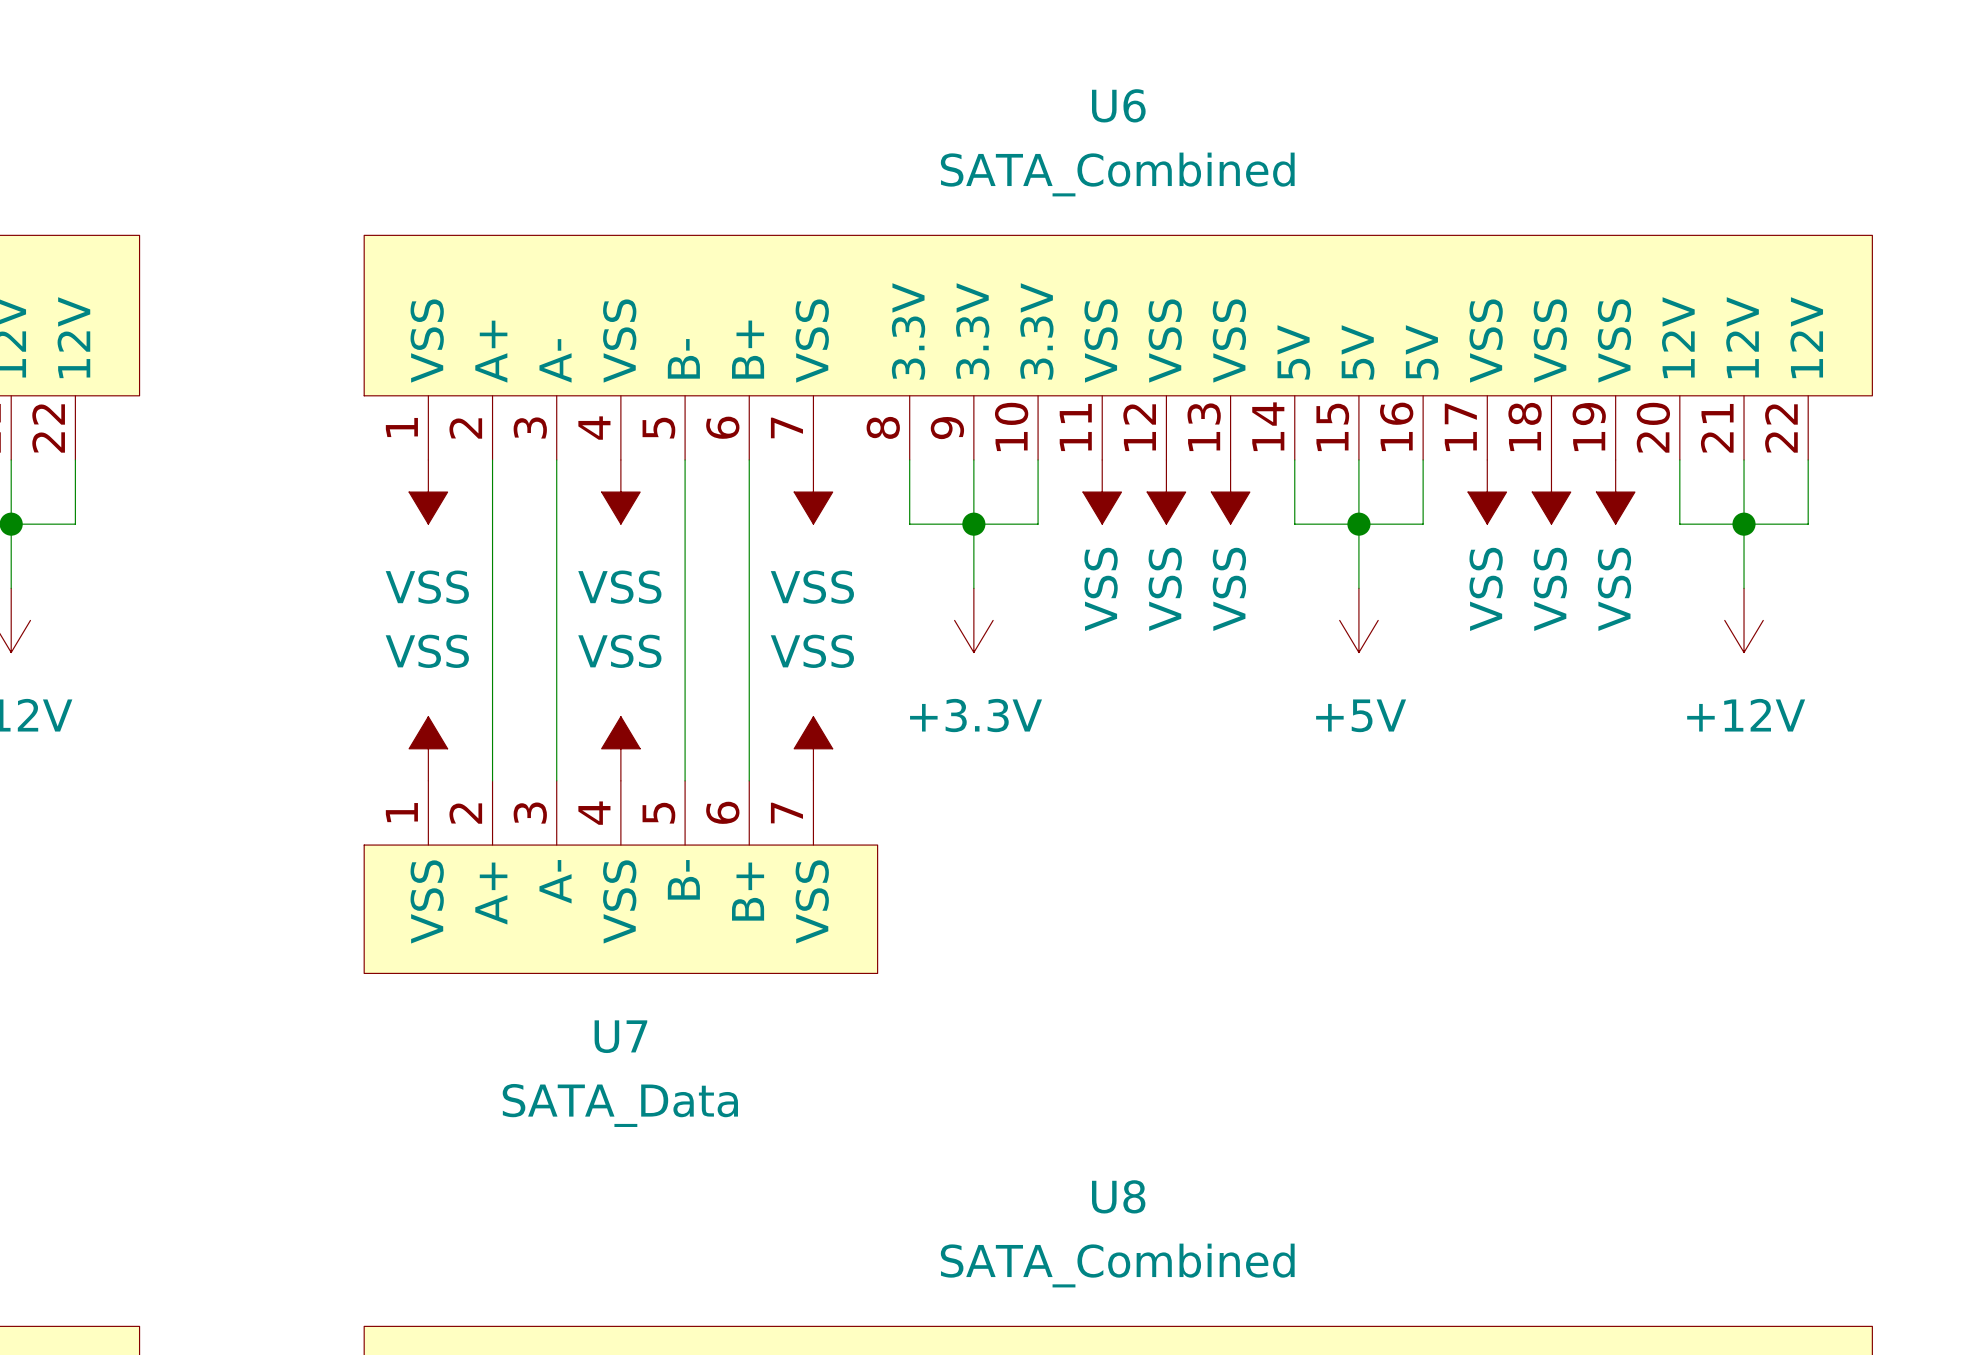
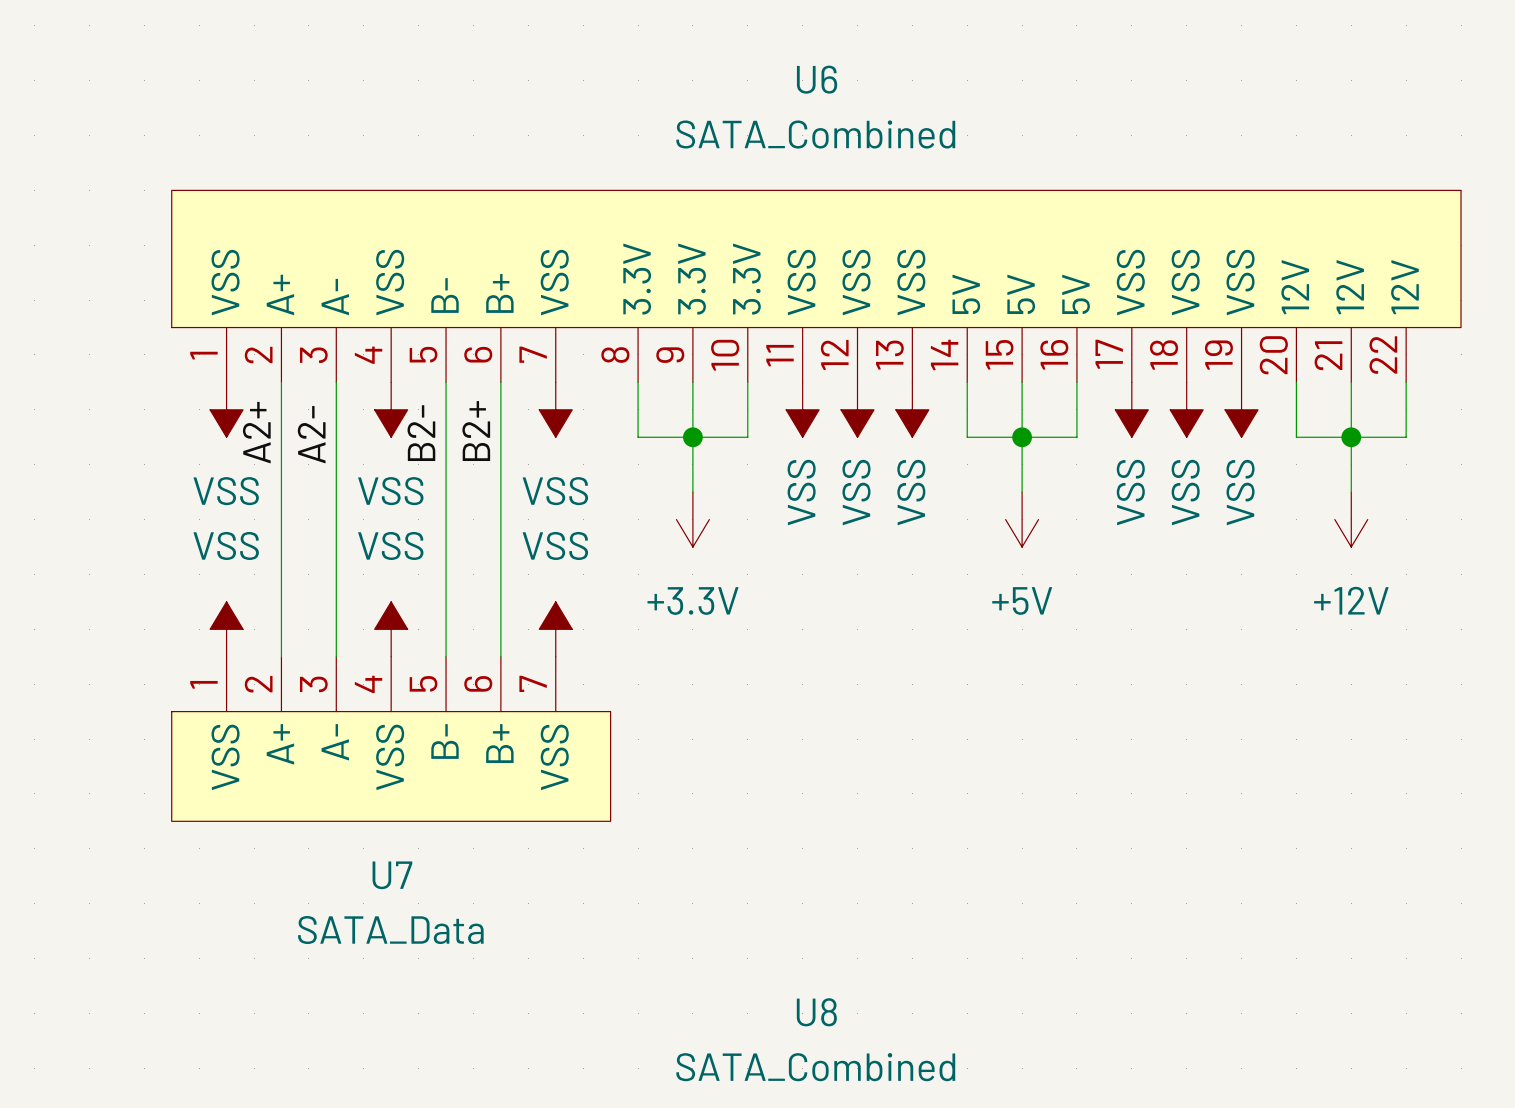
label: none -> B2+ (476, 431)
label: none -> A2+ (256, 432)
label: none -> B2- (421, 433)
label: none -> A2- (311, 434)

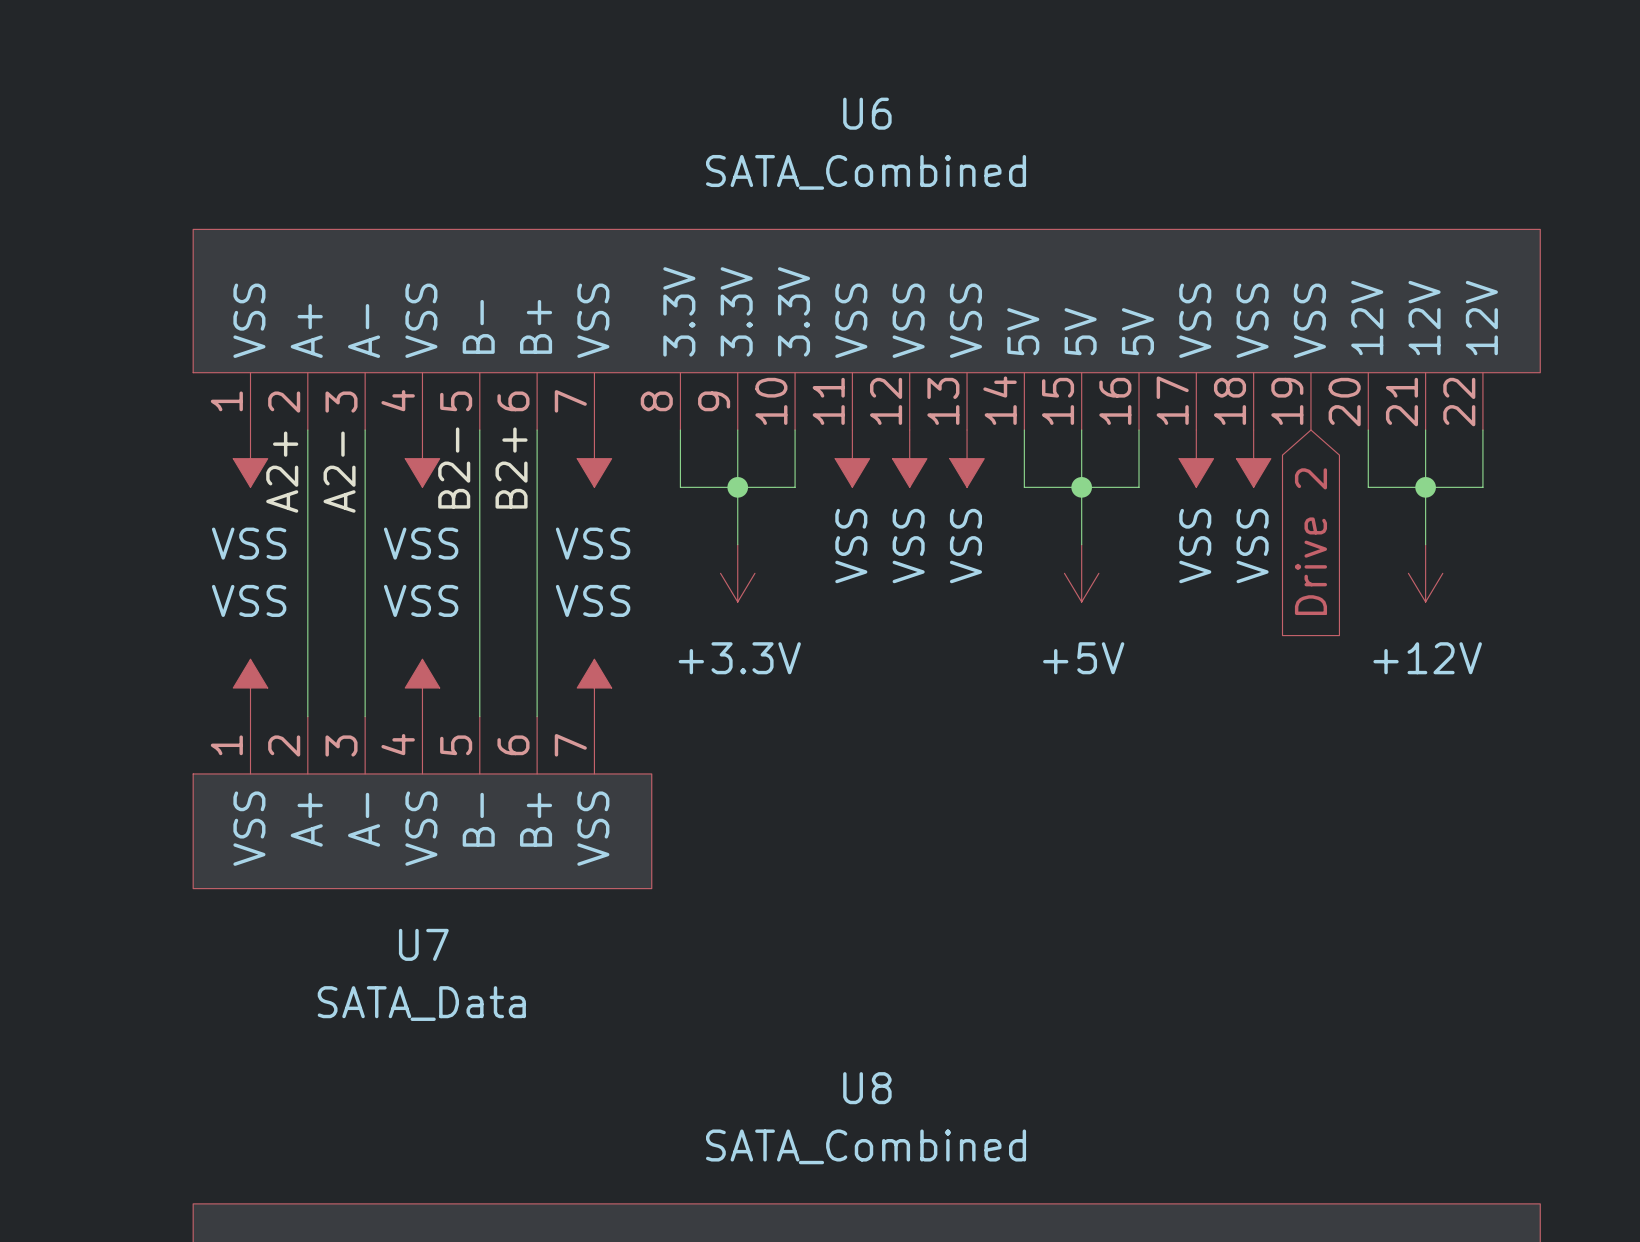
power symbol: VSS (1241, 409) -> none
global label: none -> Drive 2 (1310, 541)

